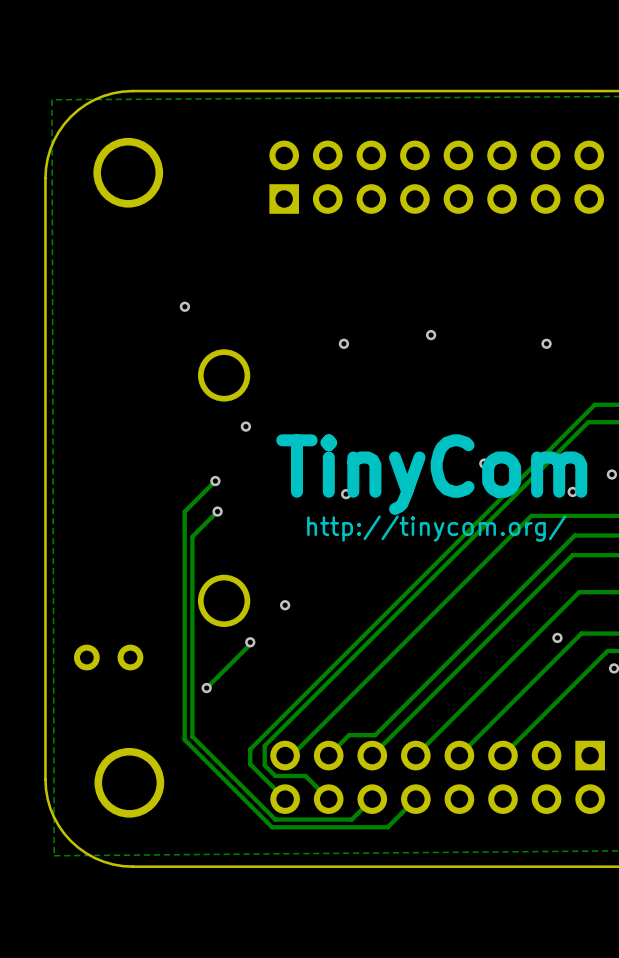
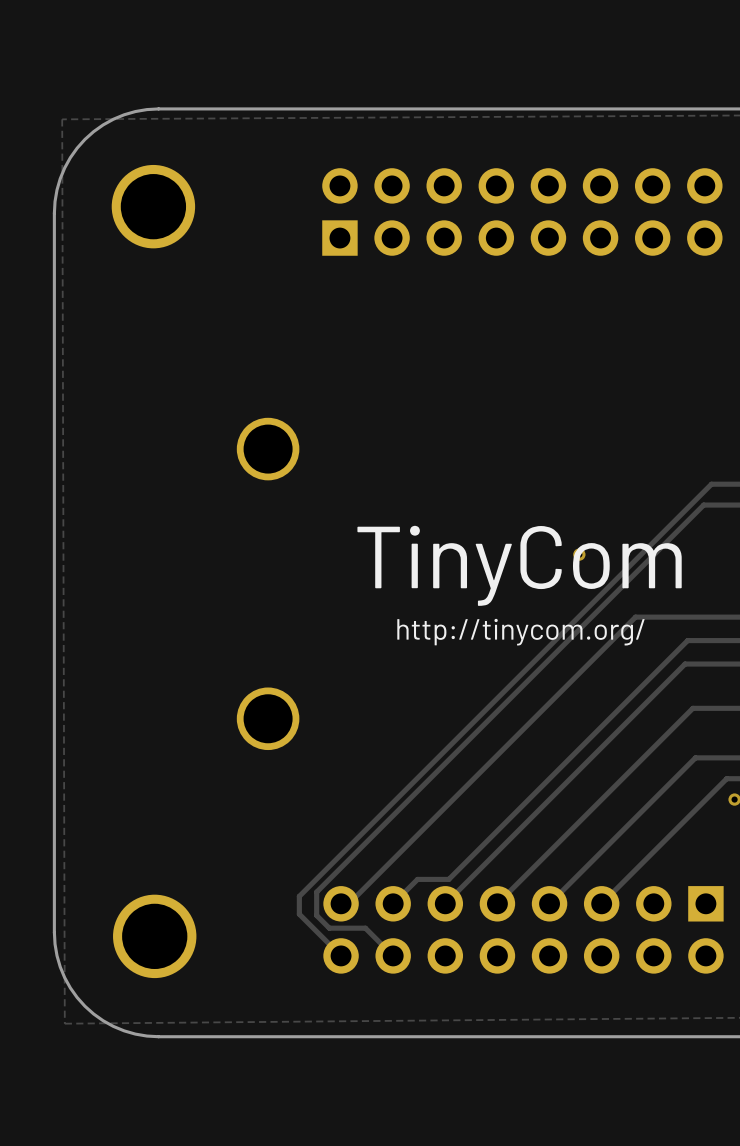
via: (184, 306) -> none
via: (431, 335) -> none
via: (343, 343) -> none
via: (546, 343) -> none
via: (245, 426) -> none
via: (611, 474) -> none
track: (215, 481) (184, 511) (184, 739) (272, 827) (387, 827) (415, 799) -> none
via: (215, 481) -> none
via: (572, 491) -> none
via: (346, 494) -> none
track: (217, 511) (192, 536) (192, 736) (275, 819) (351, 819) (372, 799) -> none
via: (217, 511) -> none
via: (285, 605) -> none
via: (557, 637) -> none
track: (250, 642) (250, 644) (206, 688) -> none
via: (250, 642) -> none
part: (108, 657) -> none
via: (206, 688) -> none

